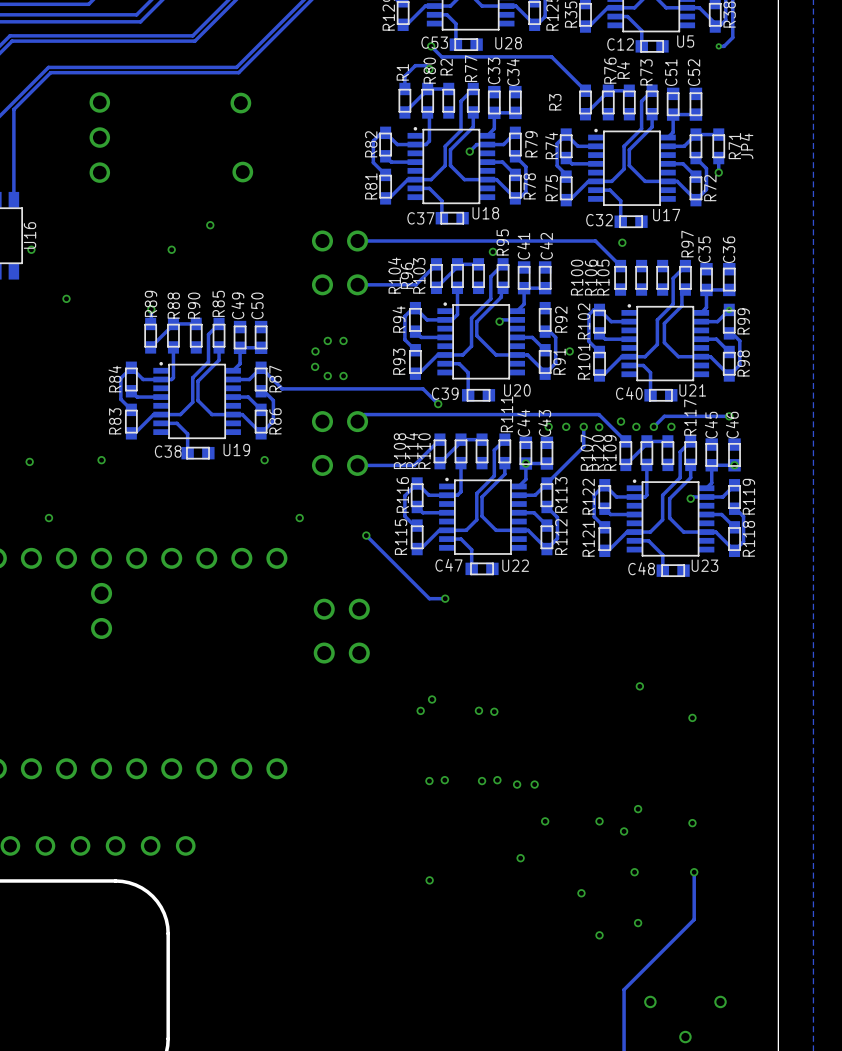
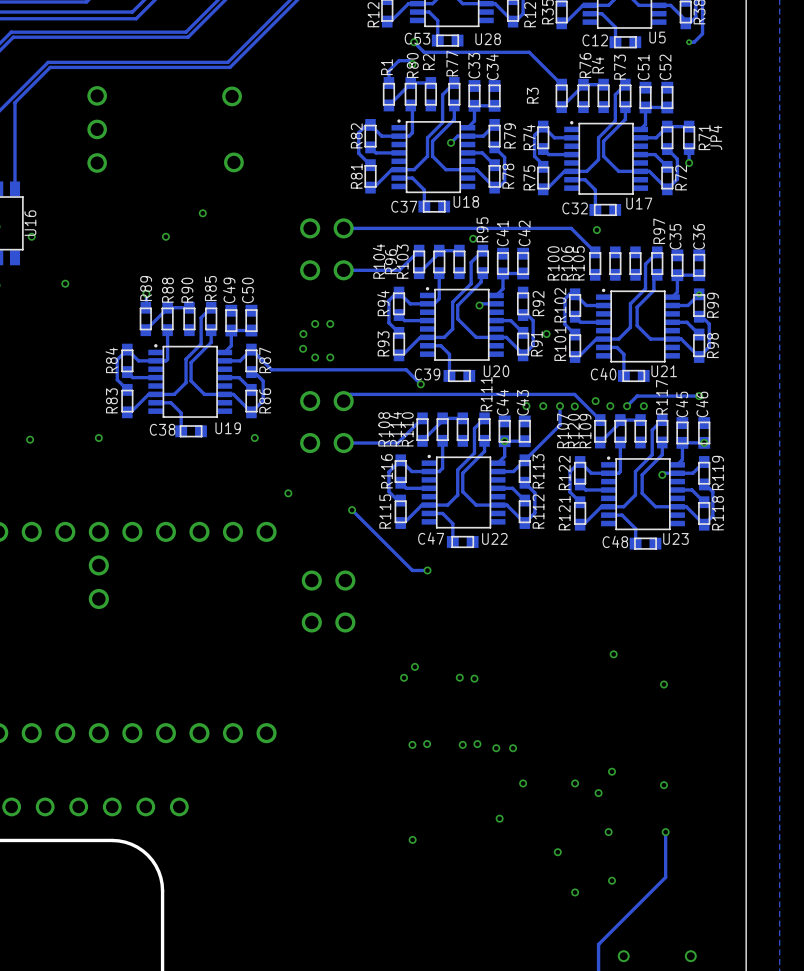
via: (48, 518) -> none

